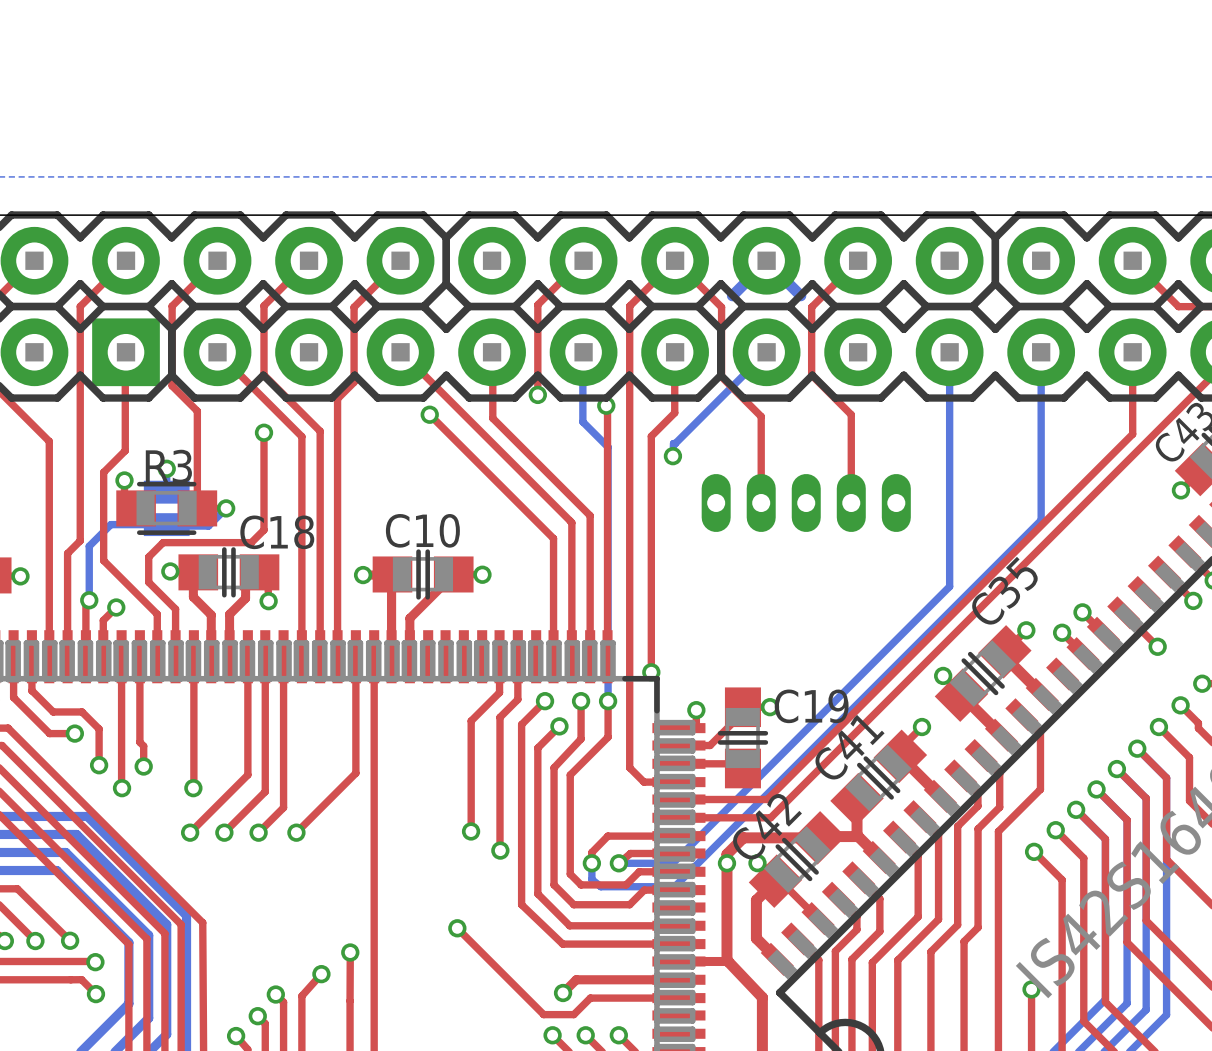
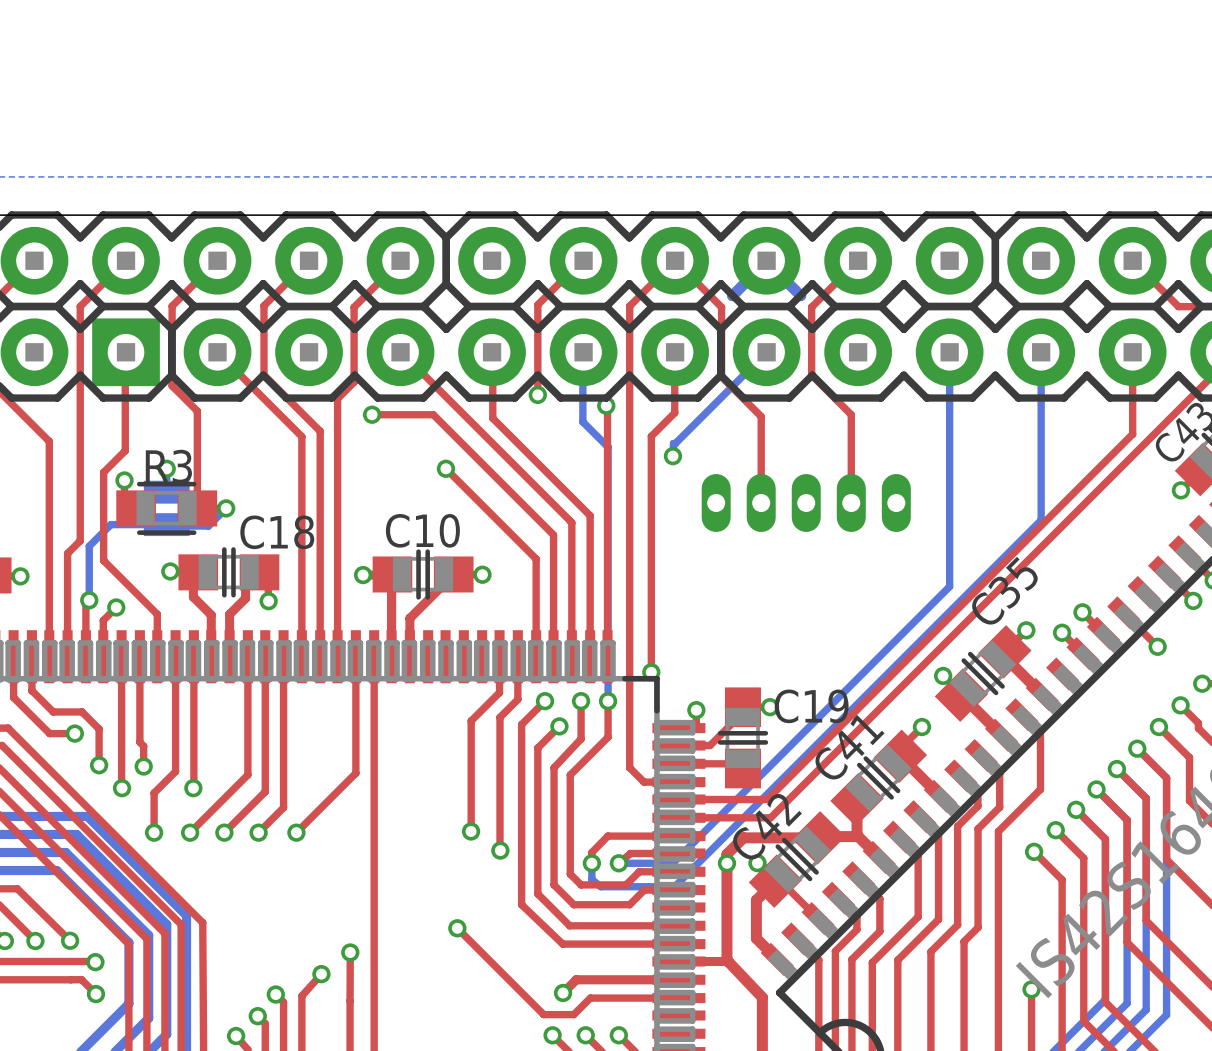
via: none -> (372, 414)
top track: (429, 414) (553, 538) -> (372, 414) (433, 414) (553, 534) (553, 538)
via: (429, 414) -> none
top track: (264, 432) (264, 530) (251, 542) (163, 542) (148, 557) (148, 582) (175, 609) (175, 656) -> (154, 832) (154, 793) (175, 771) (175, 656)
via: (264, 432) -> none
top track: none -> (445, 468) (536, 558) (536, 656)
via: none -> (445, 468)
via: none -> (154, 832)

